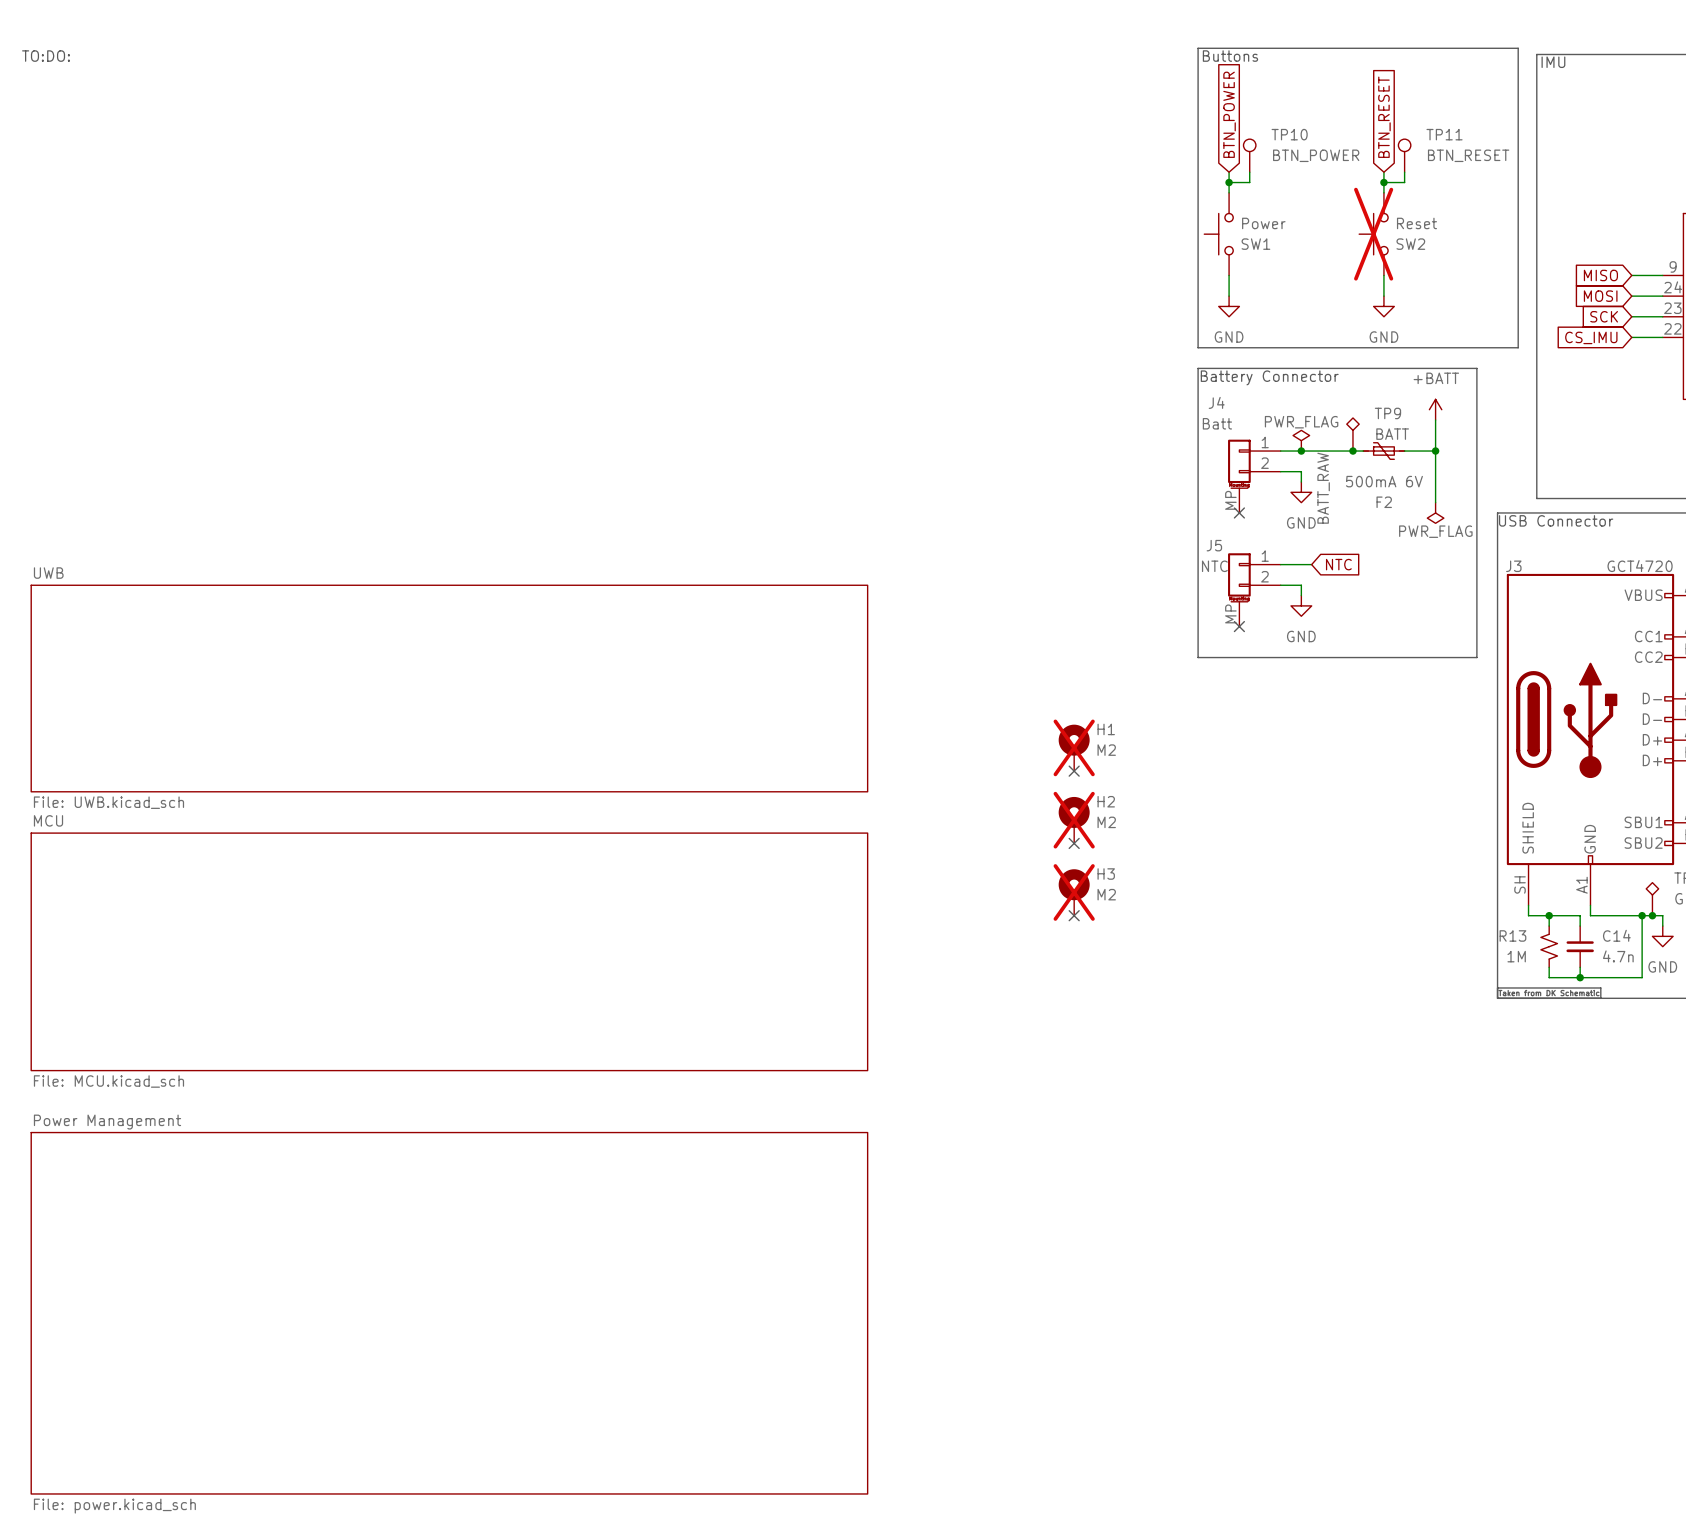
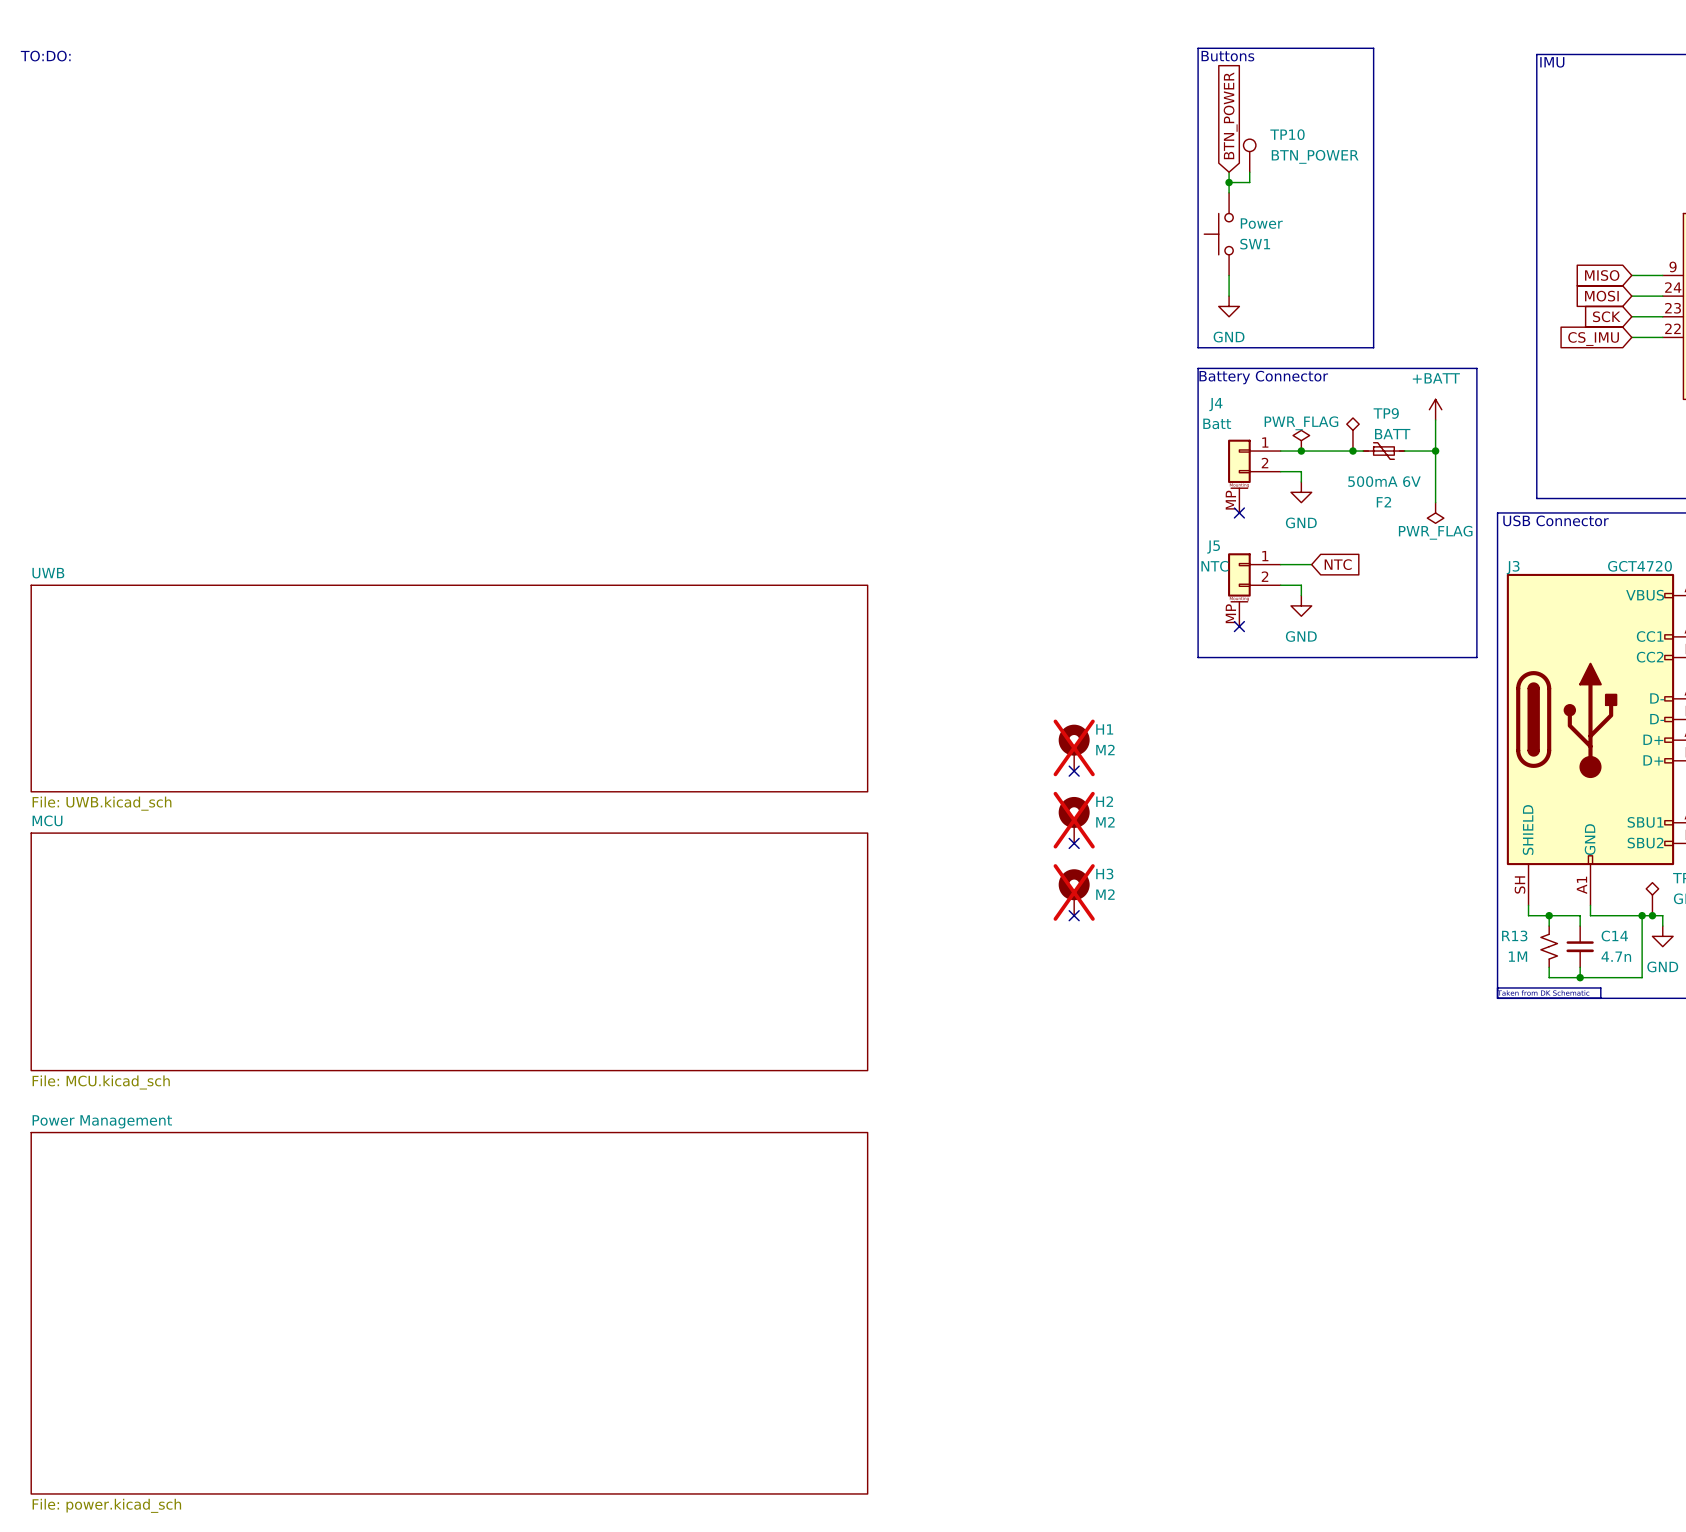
line: (1373, 48) (1518, 48) (1518, 347) (1373, 347) -> (1373, 48) (1373, 347)
global label: BTN_RESET (1384, 117) -> none
TP11: BTN_RESET (1404, 155) -> none
wire: (1383, 172) (1383, 192) -> none
wire: (1404, 172) (1404, 182) (1383, 182) -> none
junction: (1383, 182) -> none
SW2: Reset (1373, 234) -> none
wire: (1383, 275) (1383, 296) -> none
power symbol: GND (1383, 306) -> none
label: BATT_RAW (1323, 488) -> none

